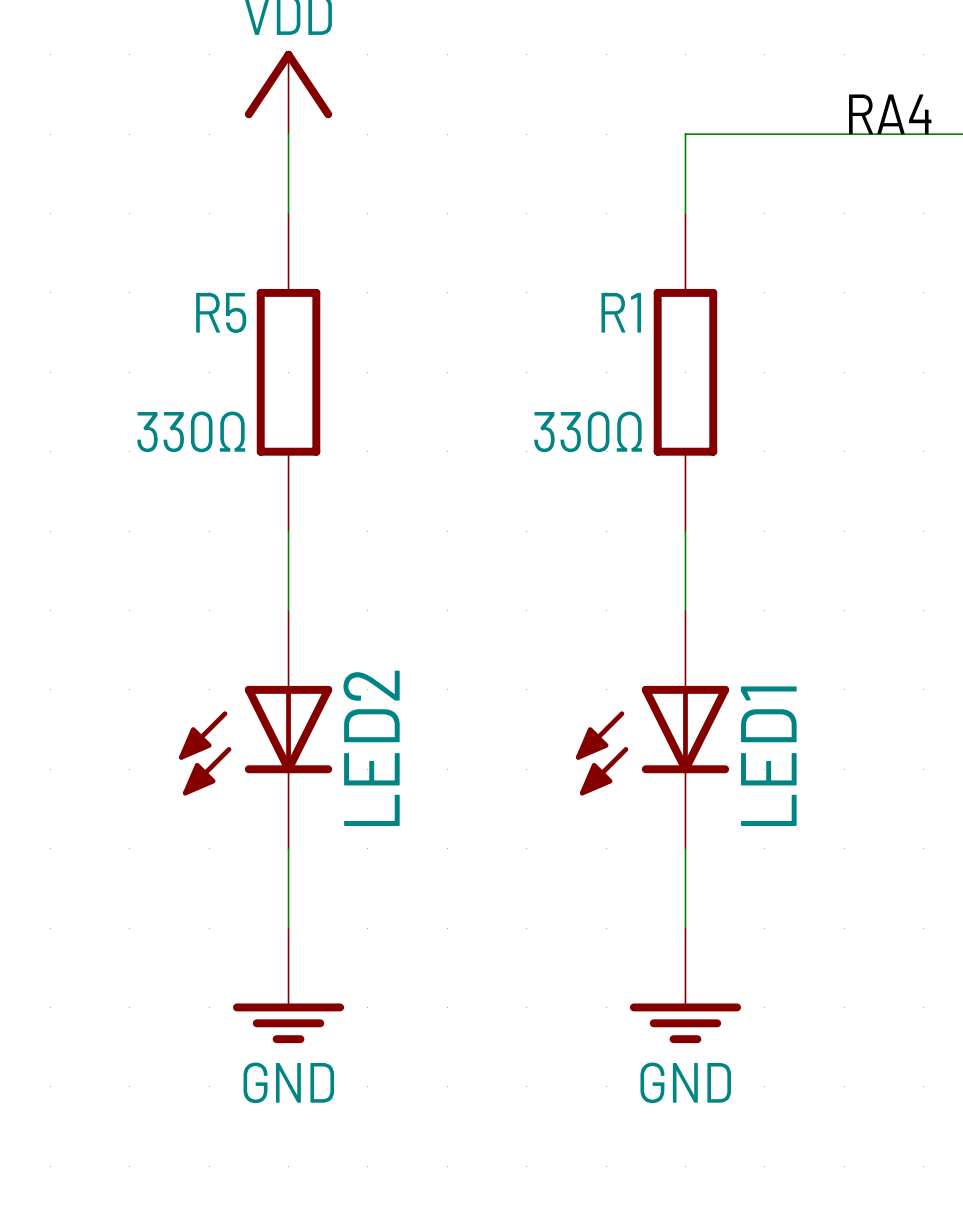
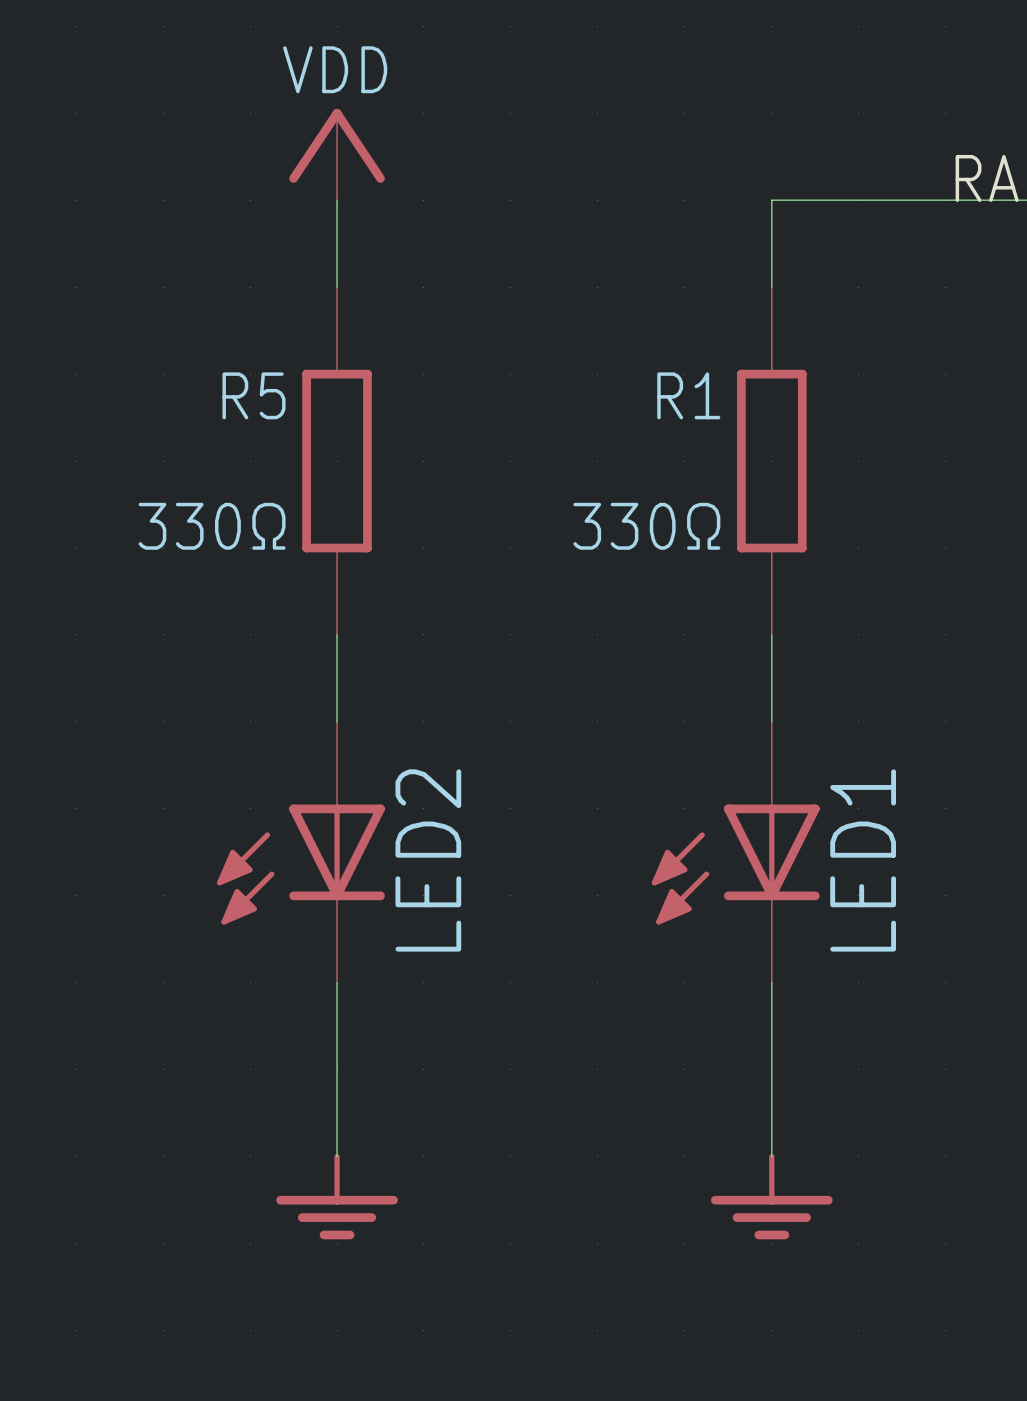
power symbol: GND (288, 985) -> none
power symbol: GND (685, 985) -> none
power symbol: none -> (337, 1196)
power symbol: none -> (771, 1196)

